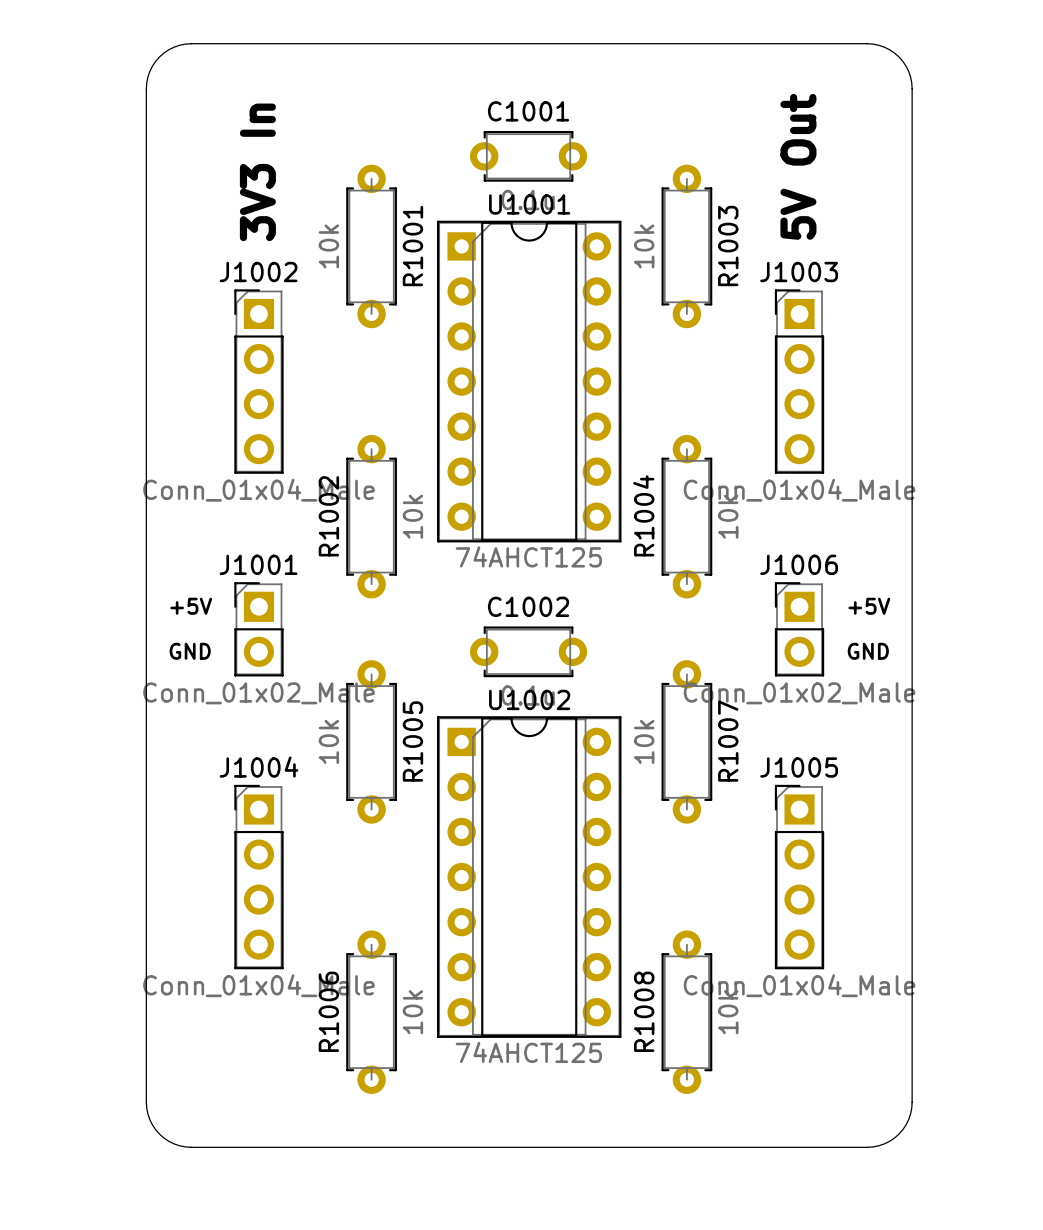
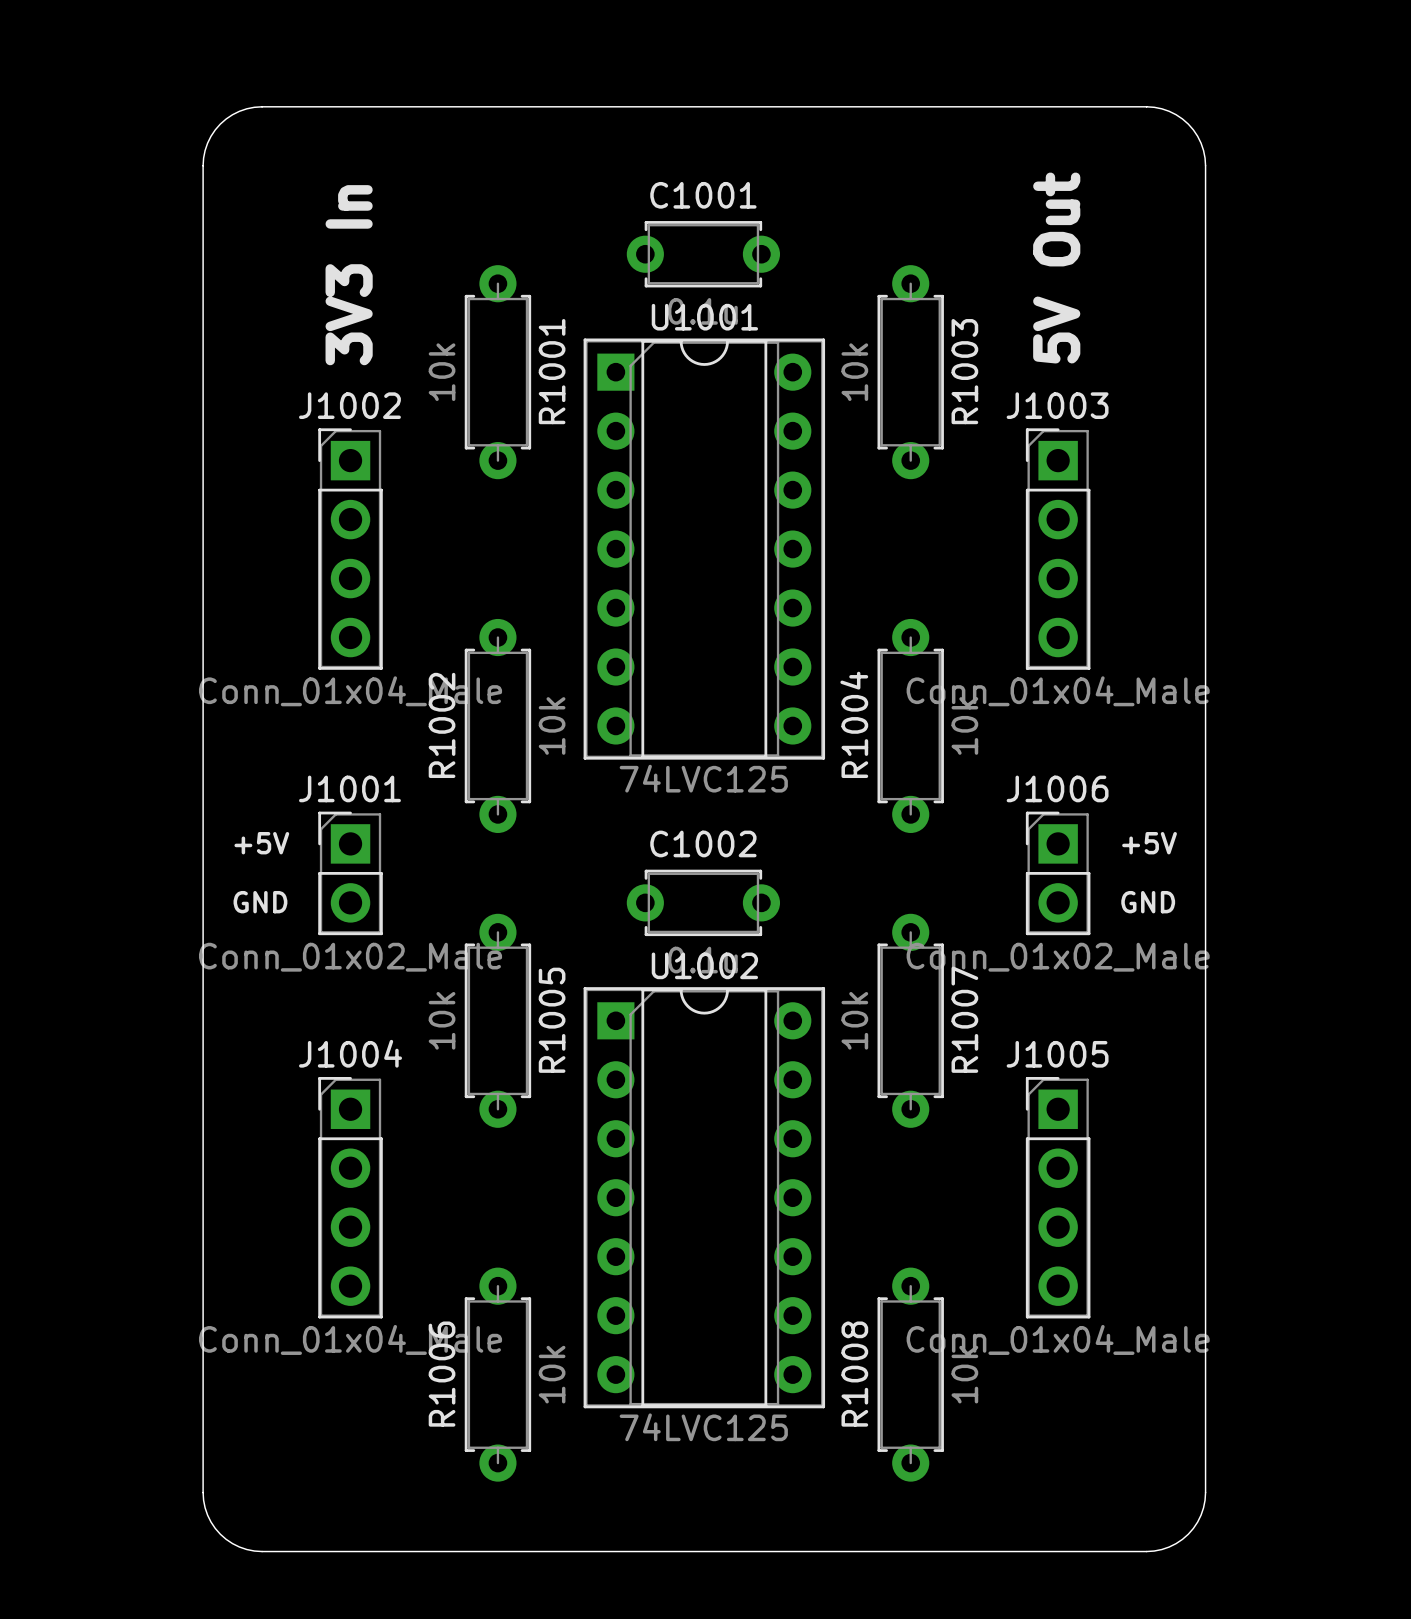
U1001 value: 74AHCT125 (528, 556) -> 74LVC125 (703, 778)
U1002 value: 74AHCT125 (528, 1052) -> 74LVC125 (703, 1427)

